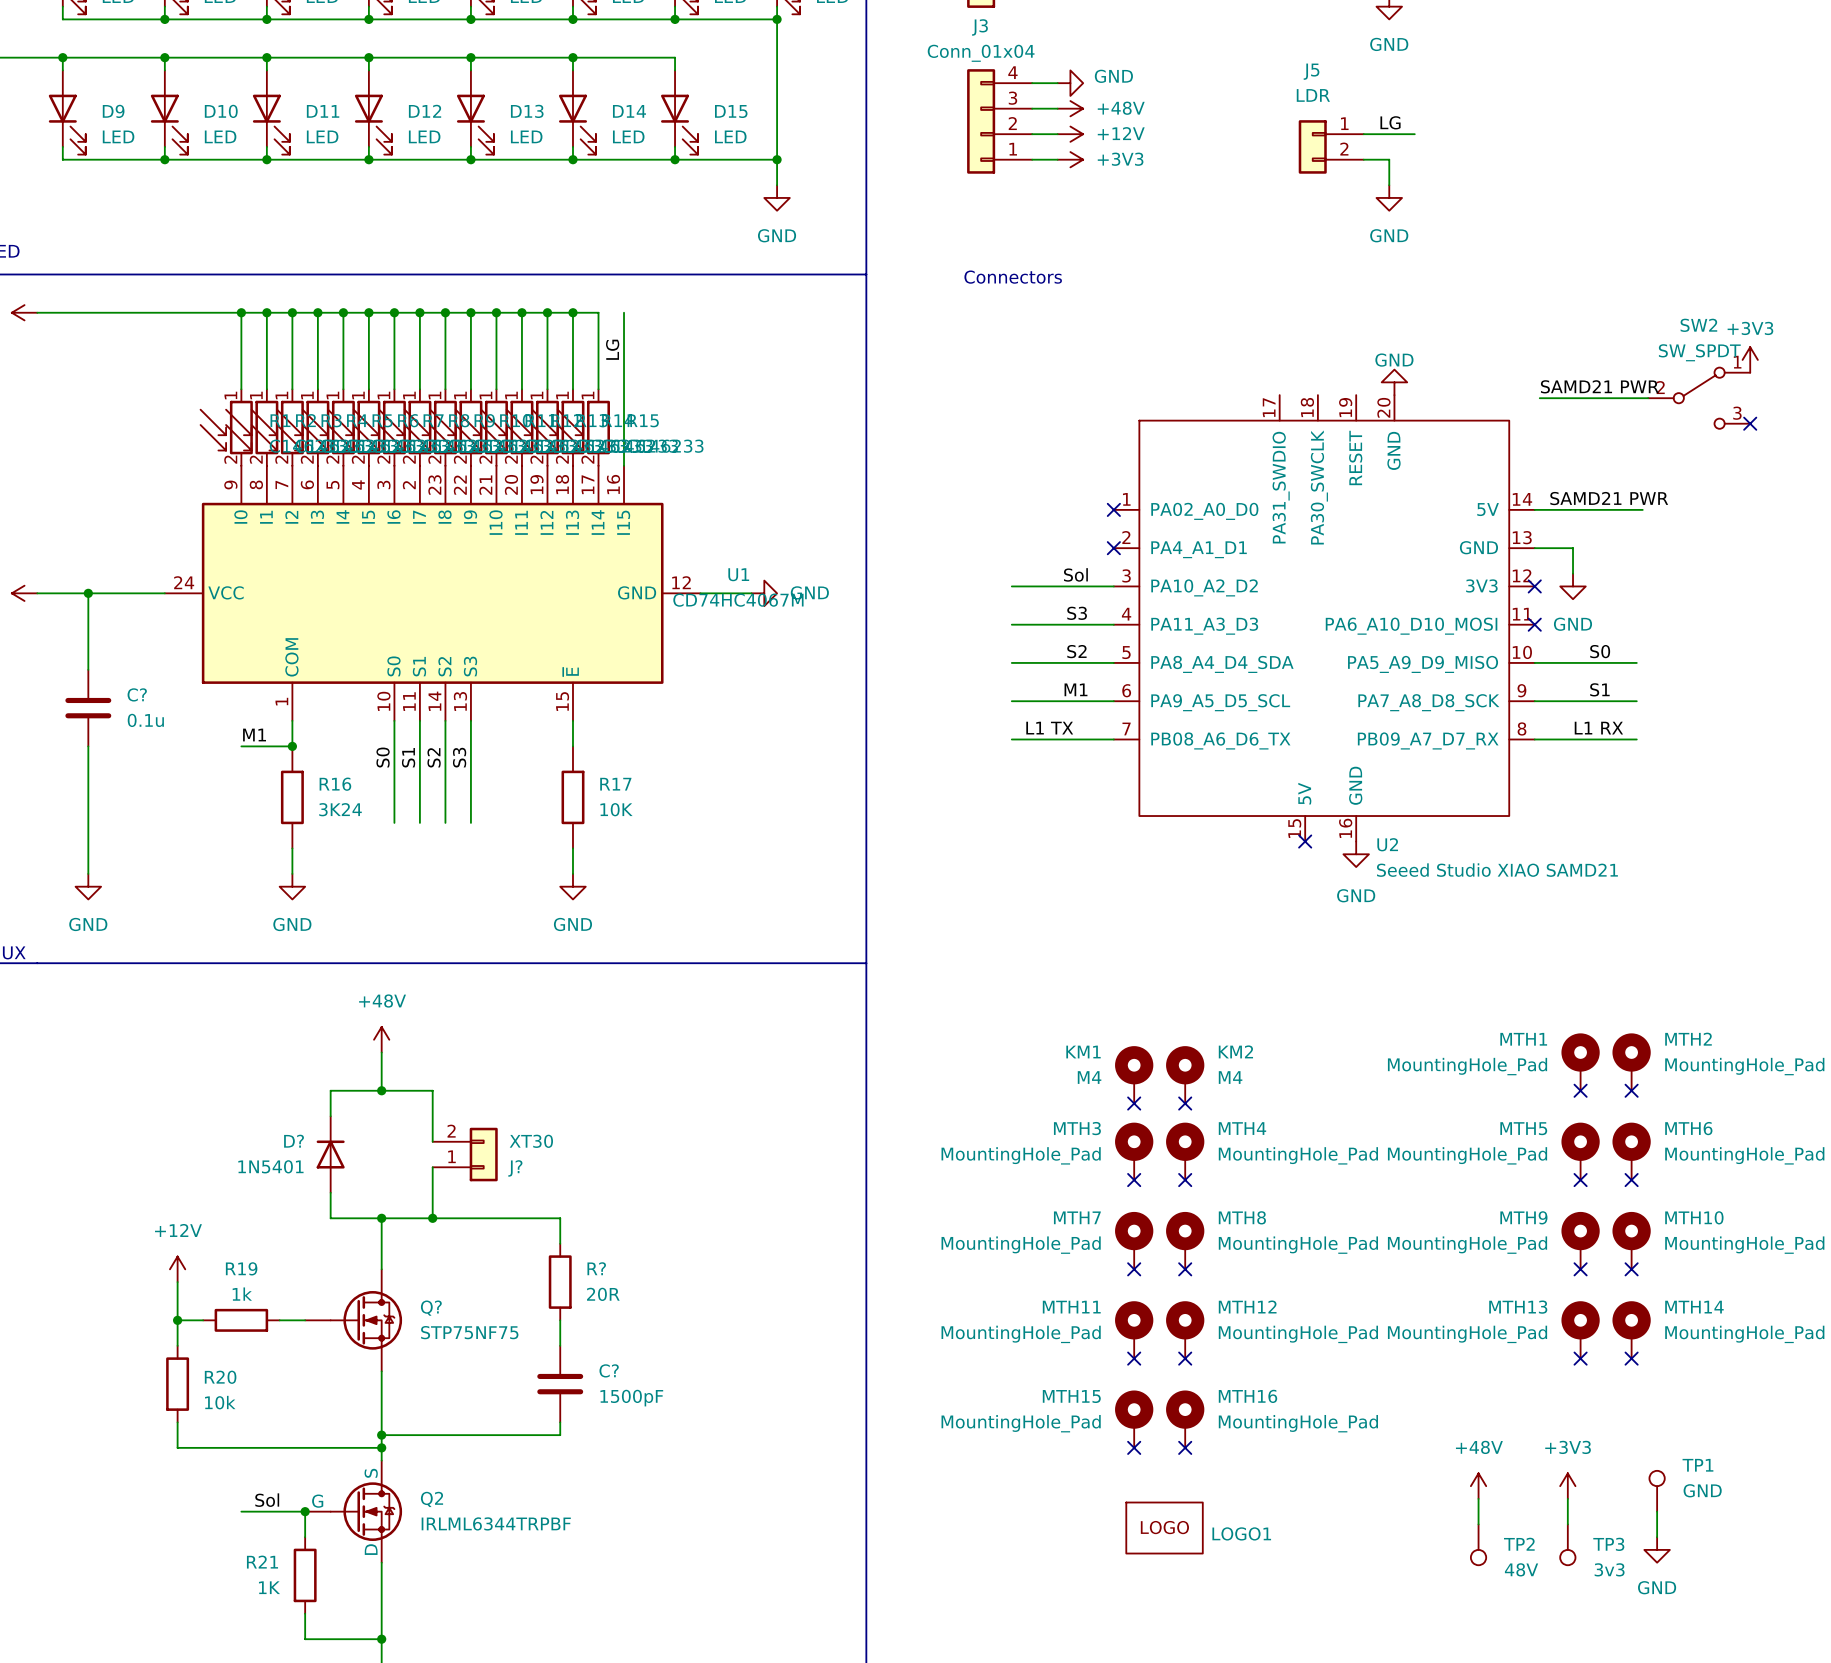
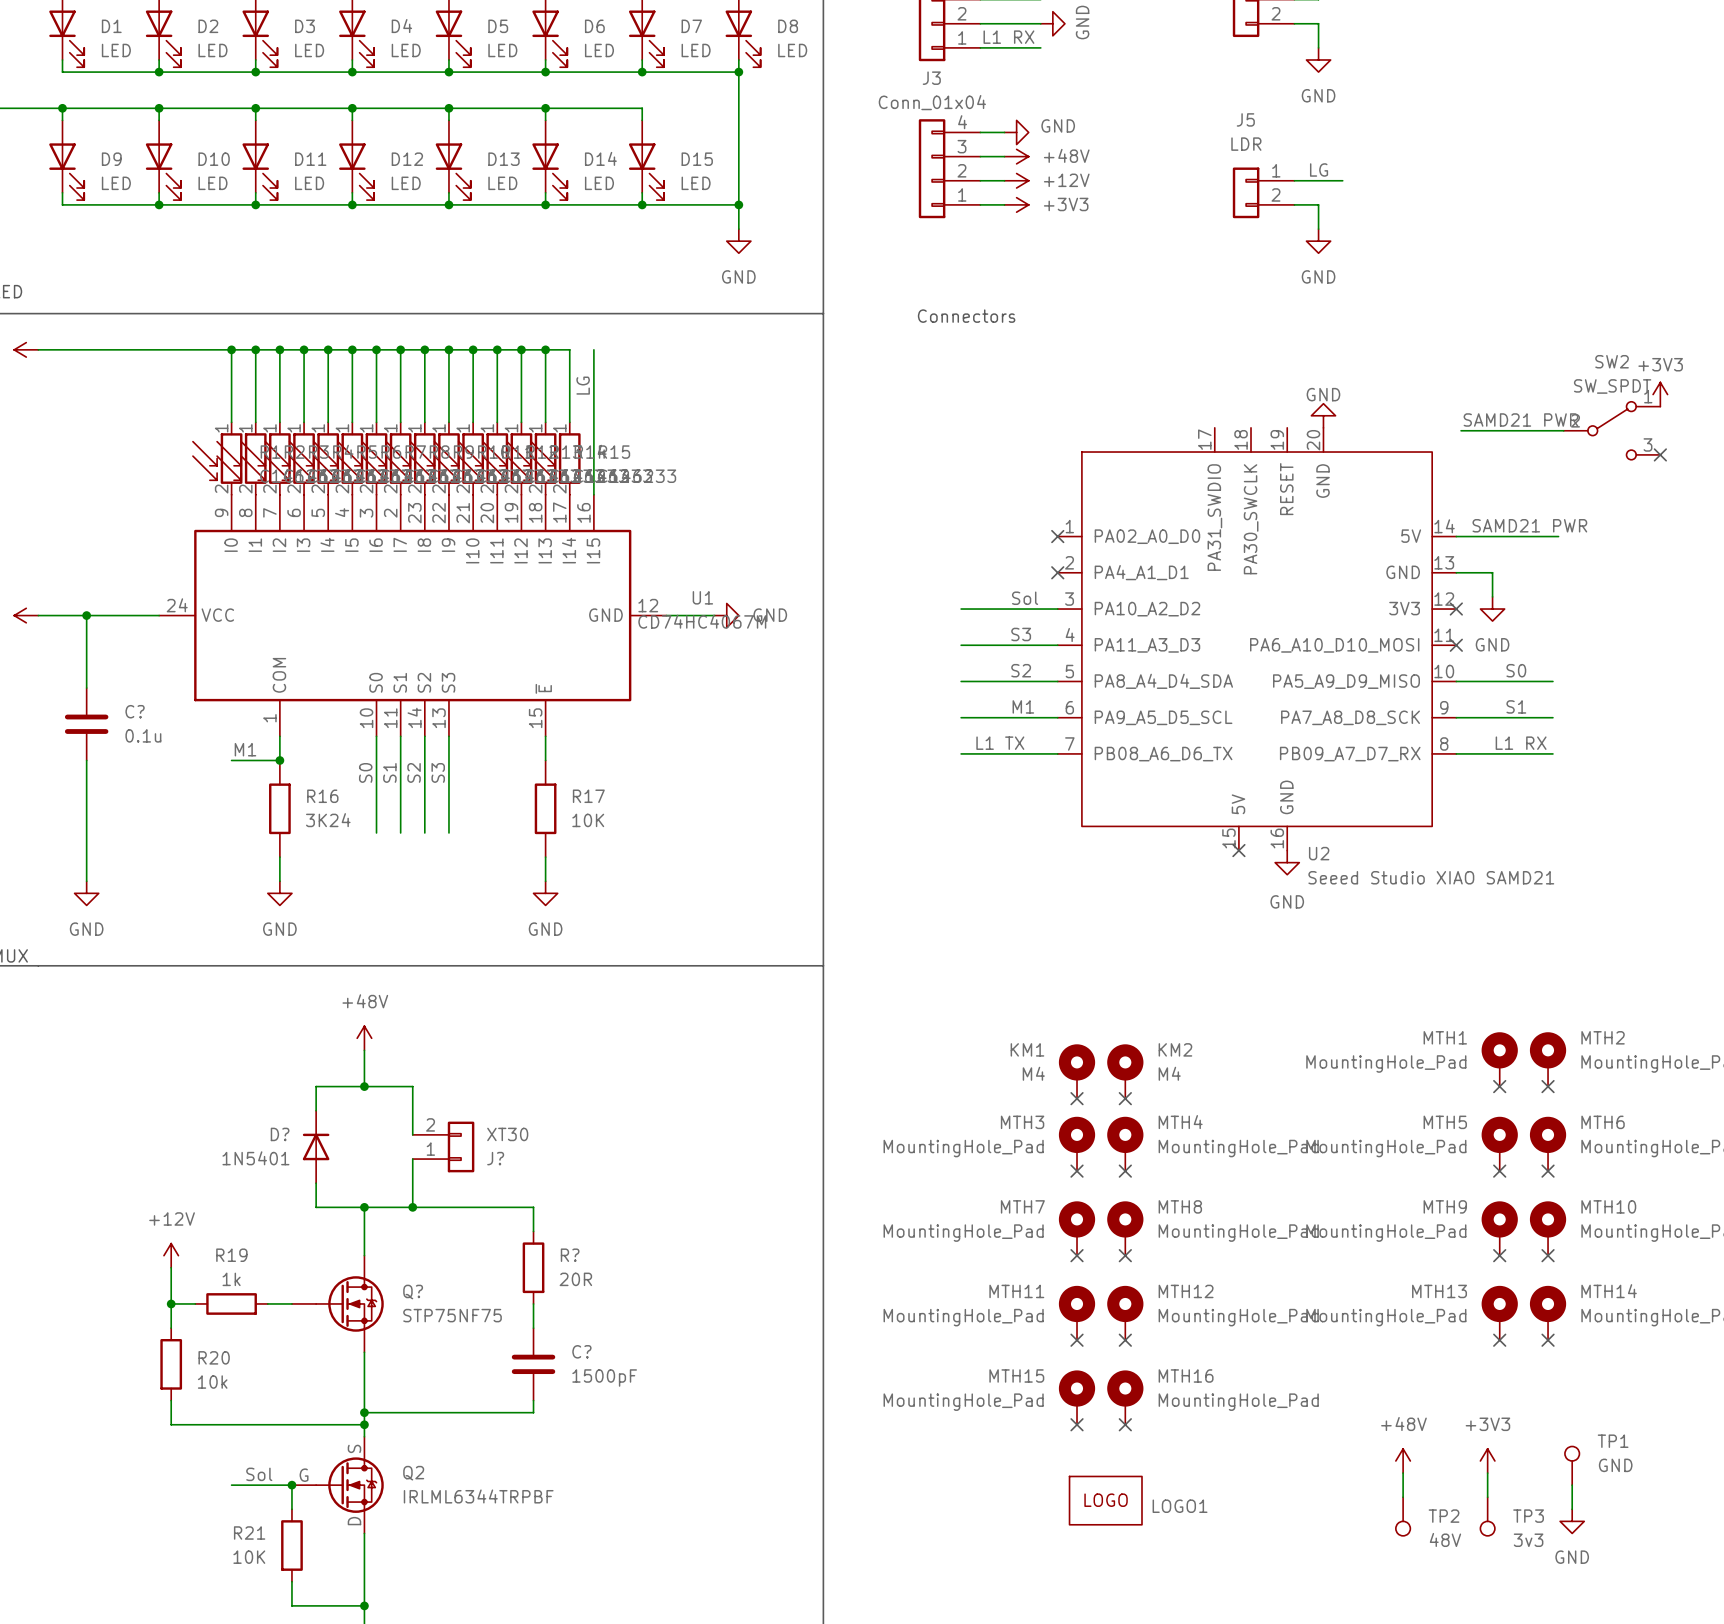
R21 value: 1K (269, 1587) -> 10K (249, 1557)

